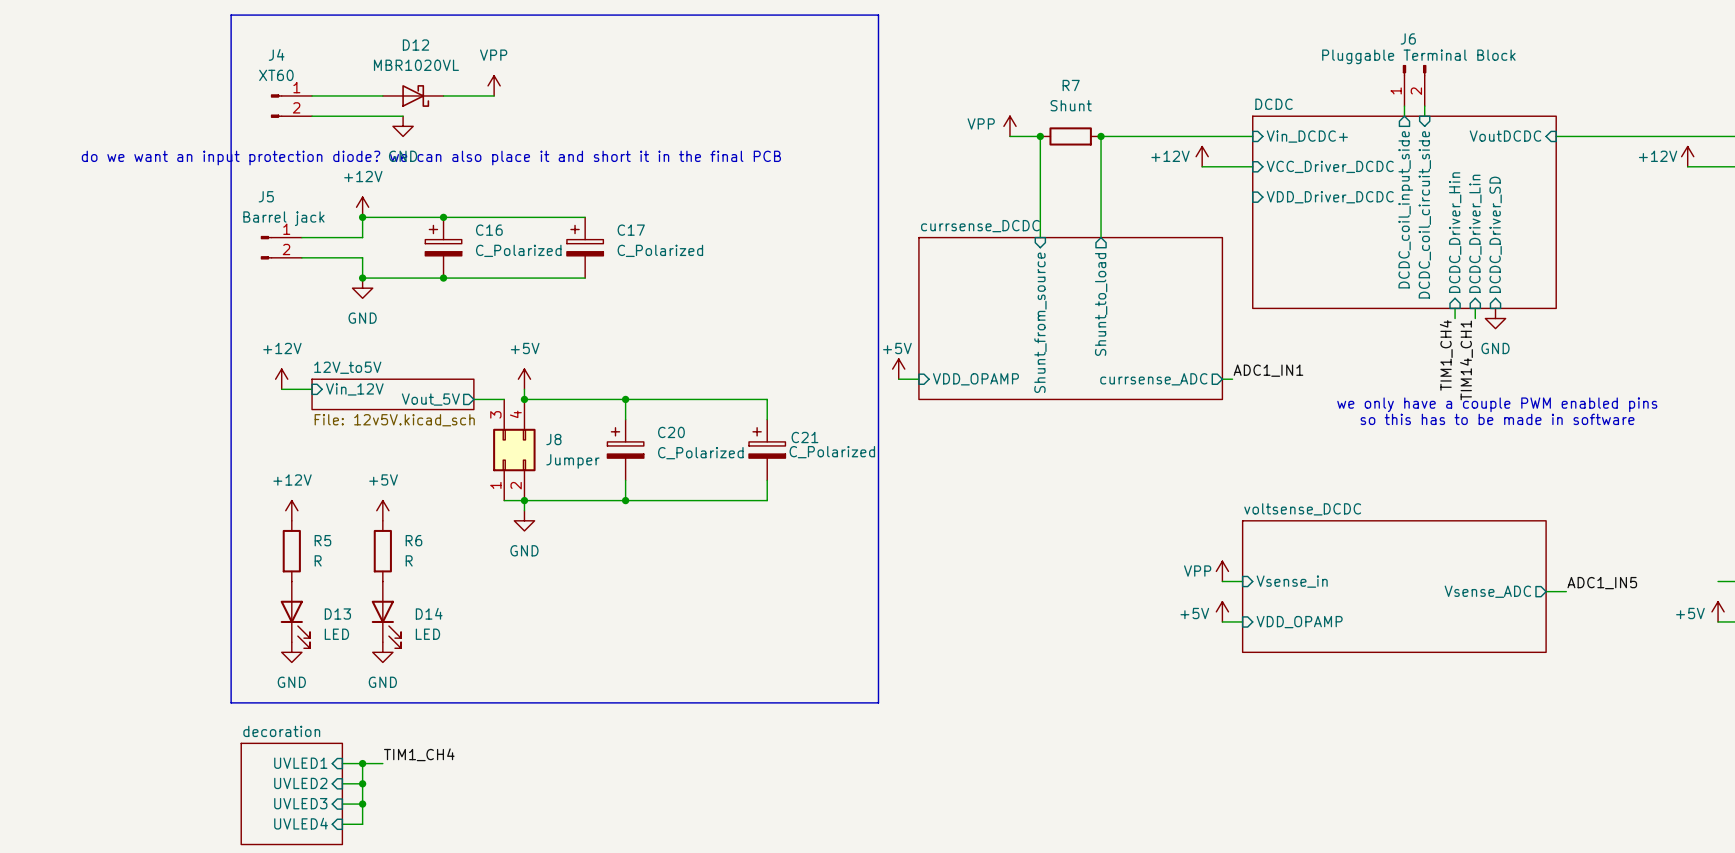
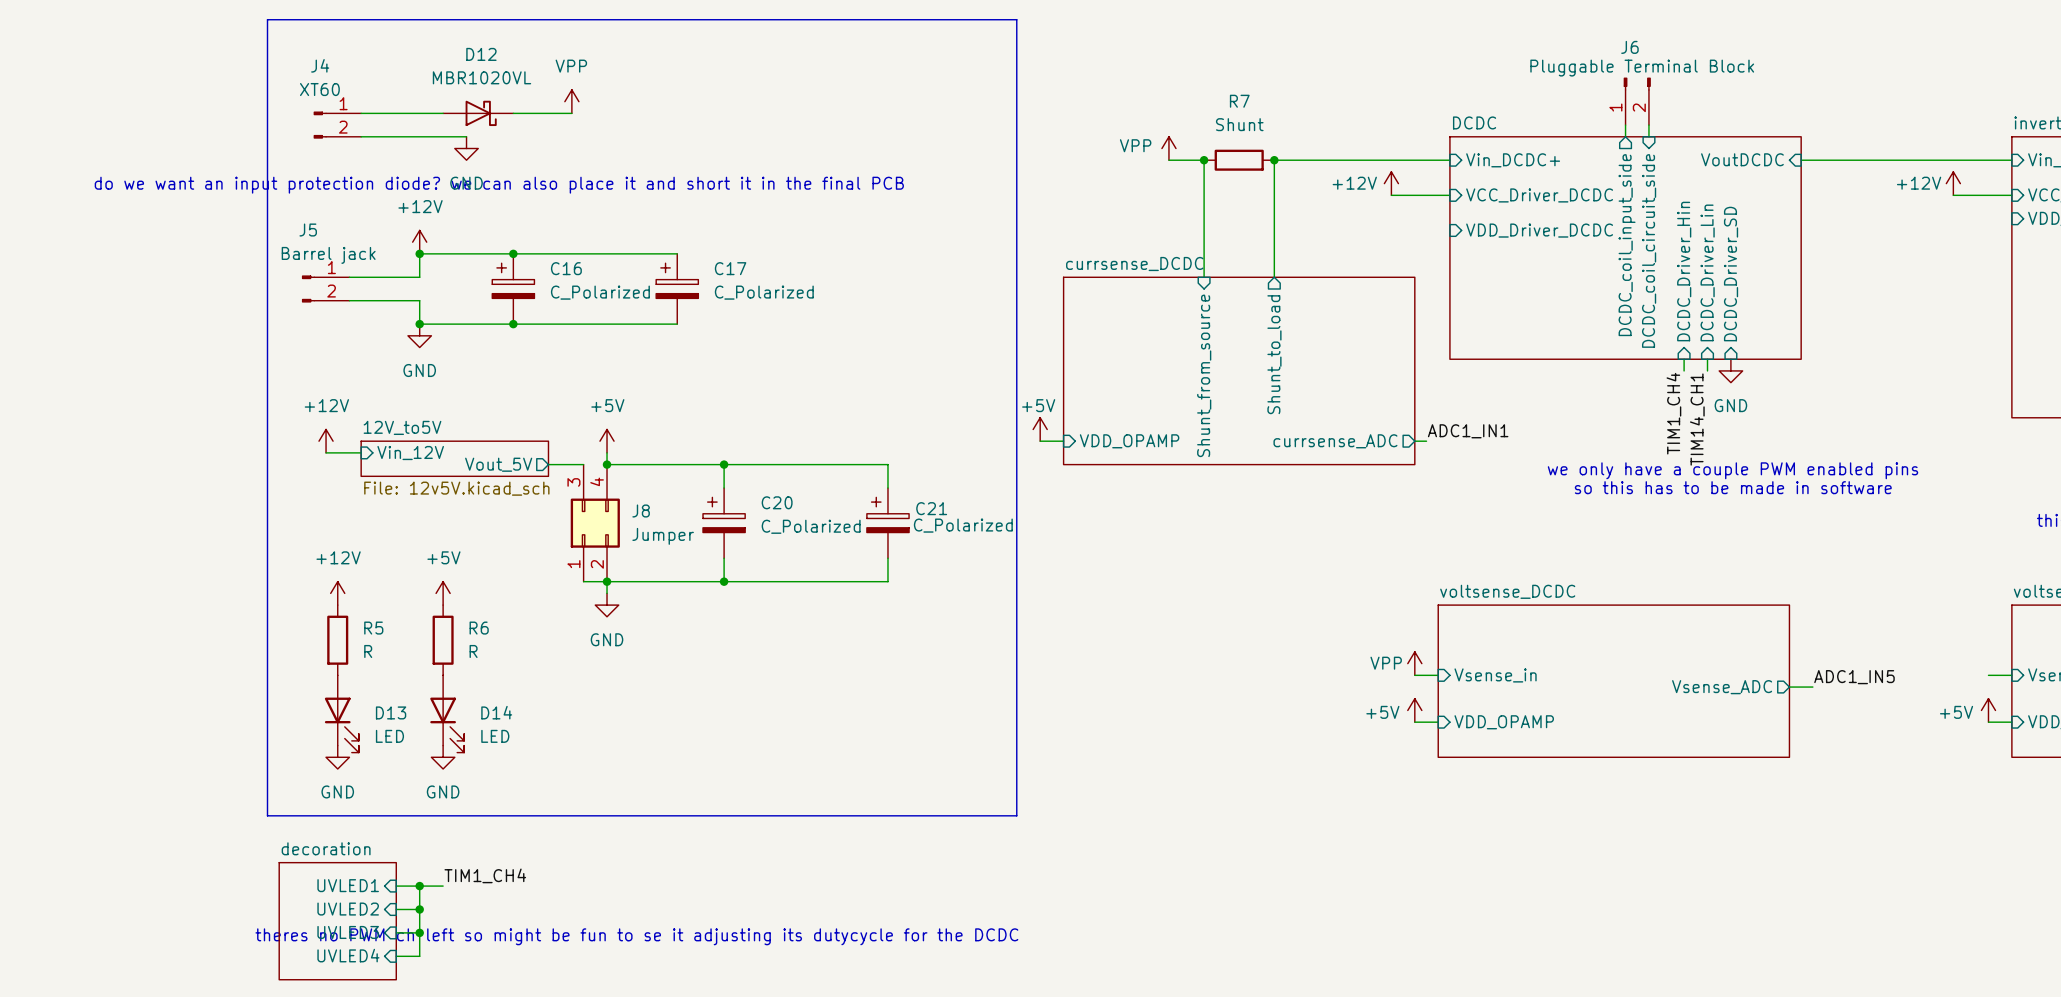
text: none -> theres no PWM ch left so might be fun to se it adjusting its dutycycle for the DCDC (636, 936)

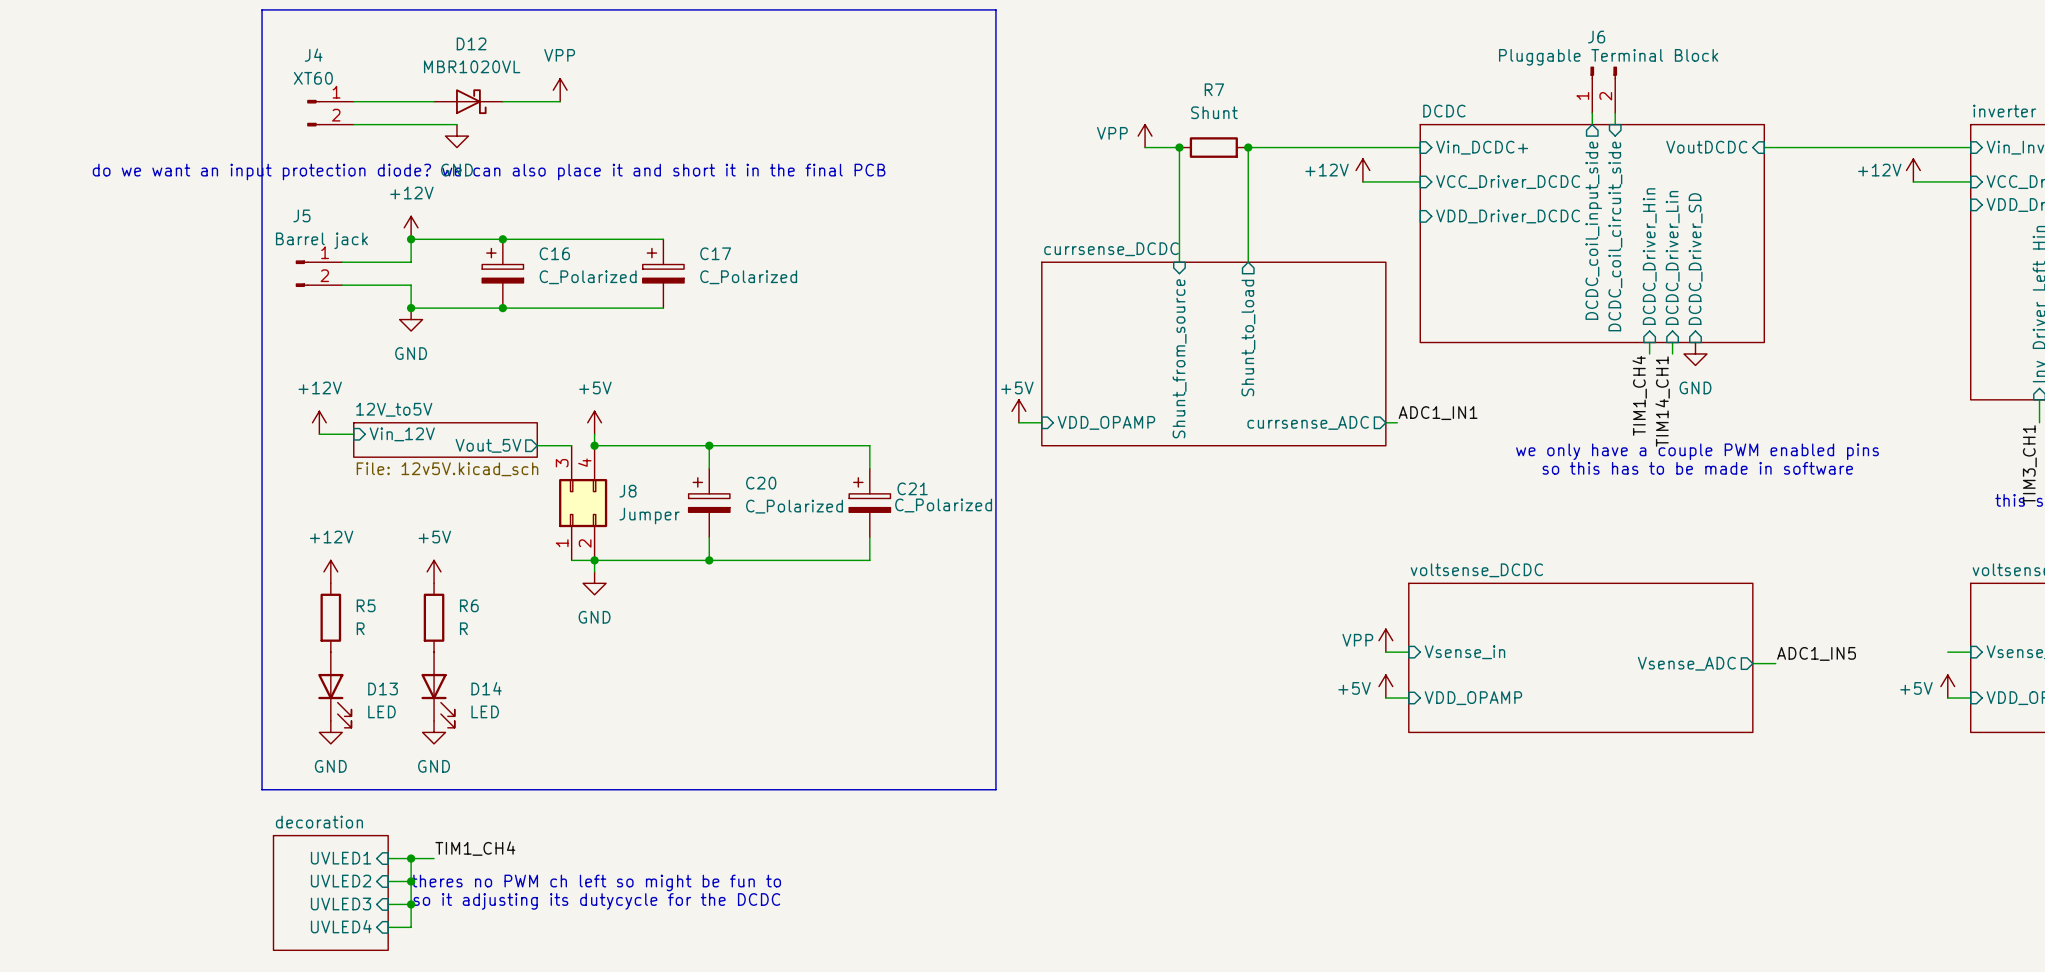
text: none -> theres no PWM ch left so might be fun to (596, 882)
text: theres no PWM ch left so might be fun to se it adjusting its dutycycle for the DCDC (636, 936) -> so it adjusting its dutycycle for the DCDC (596, 901)

